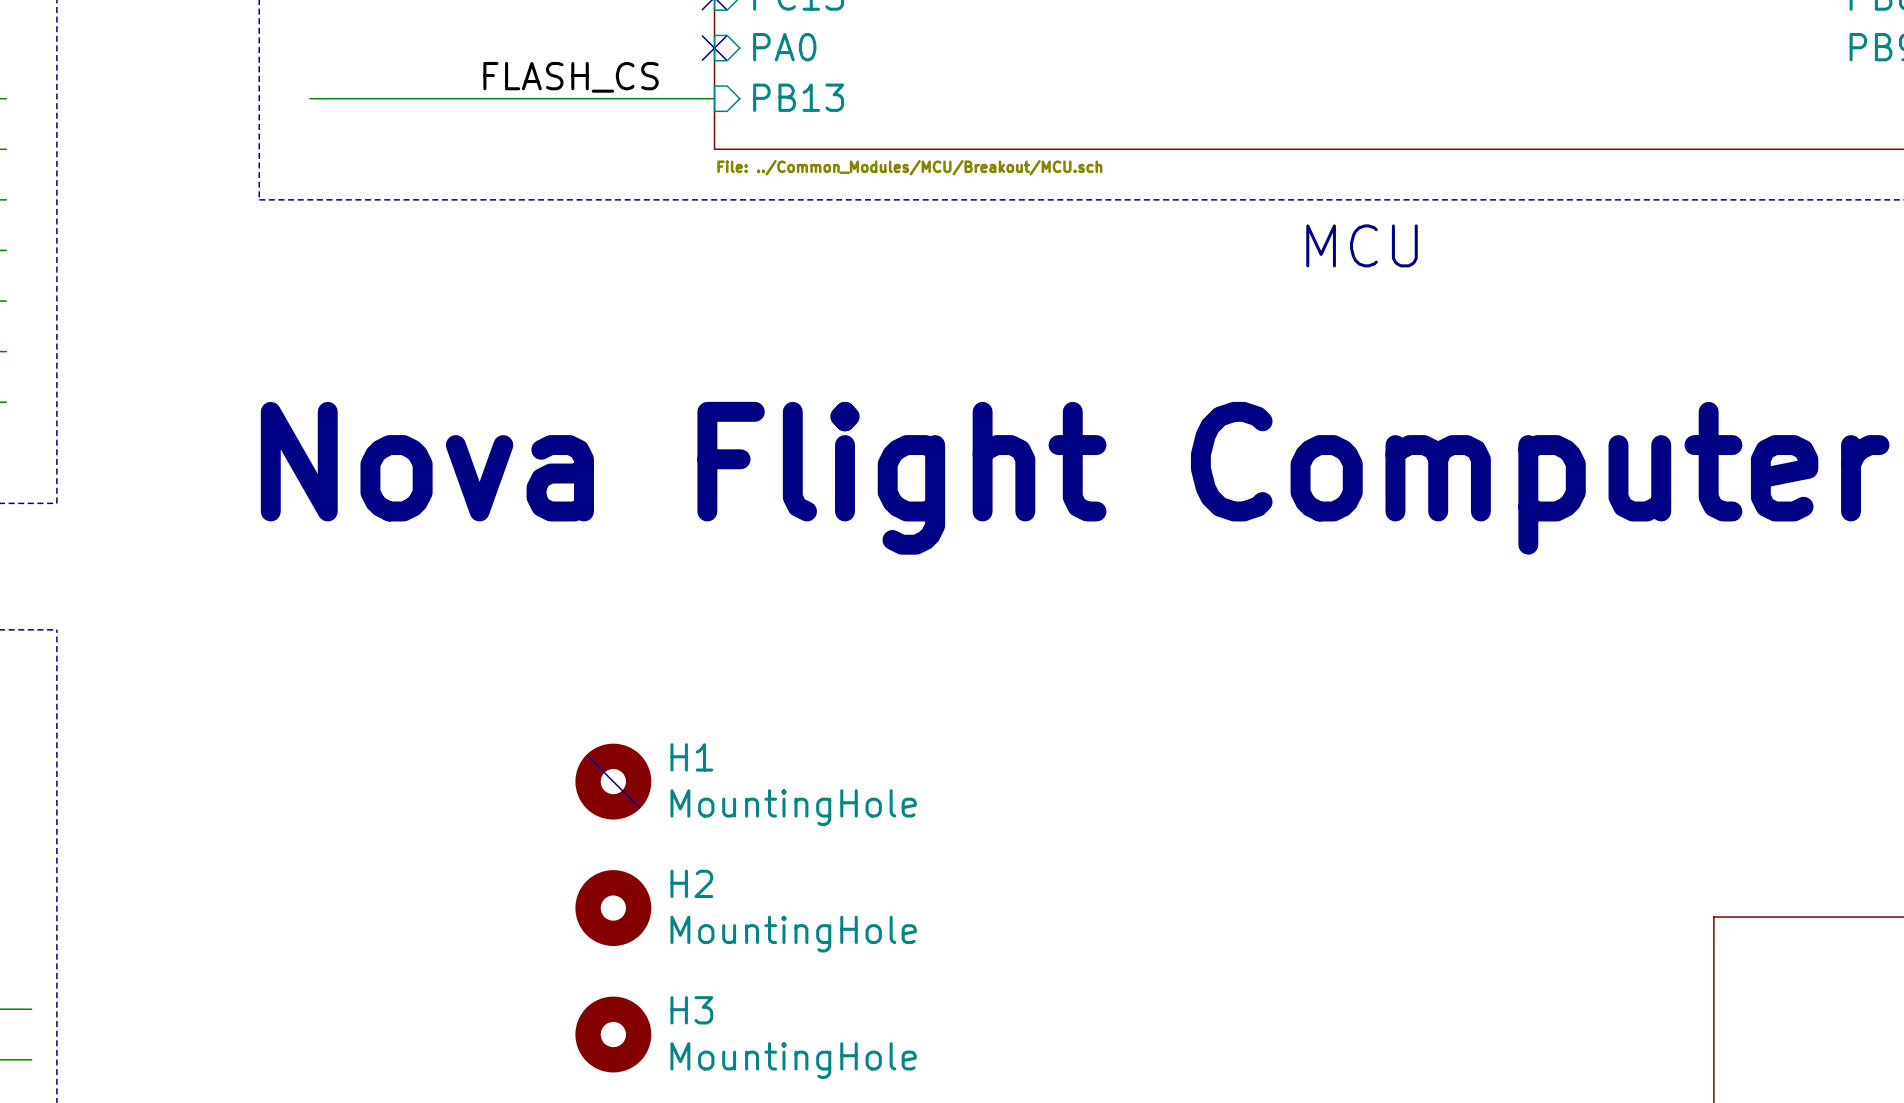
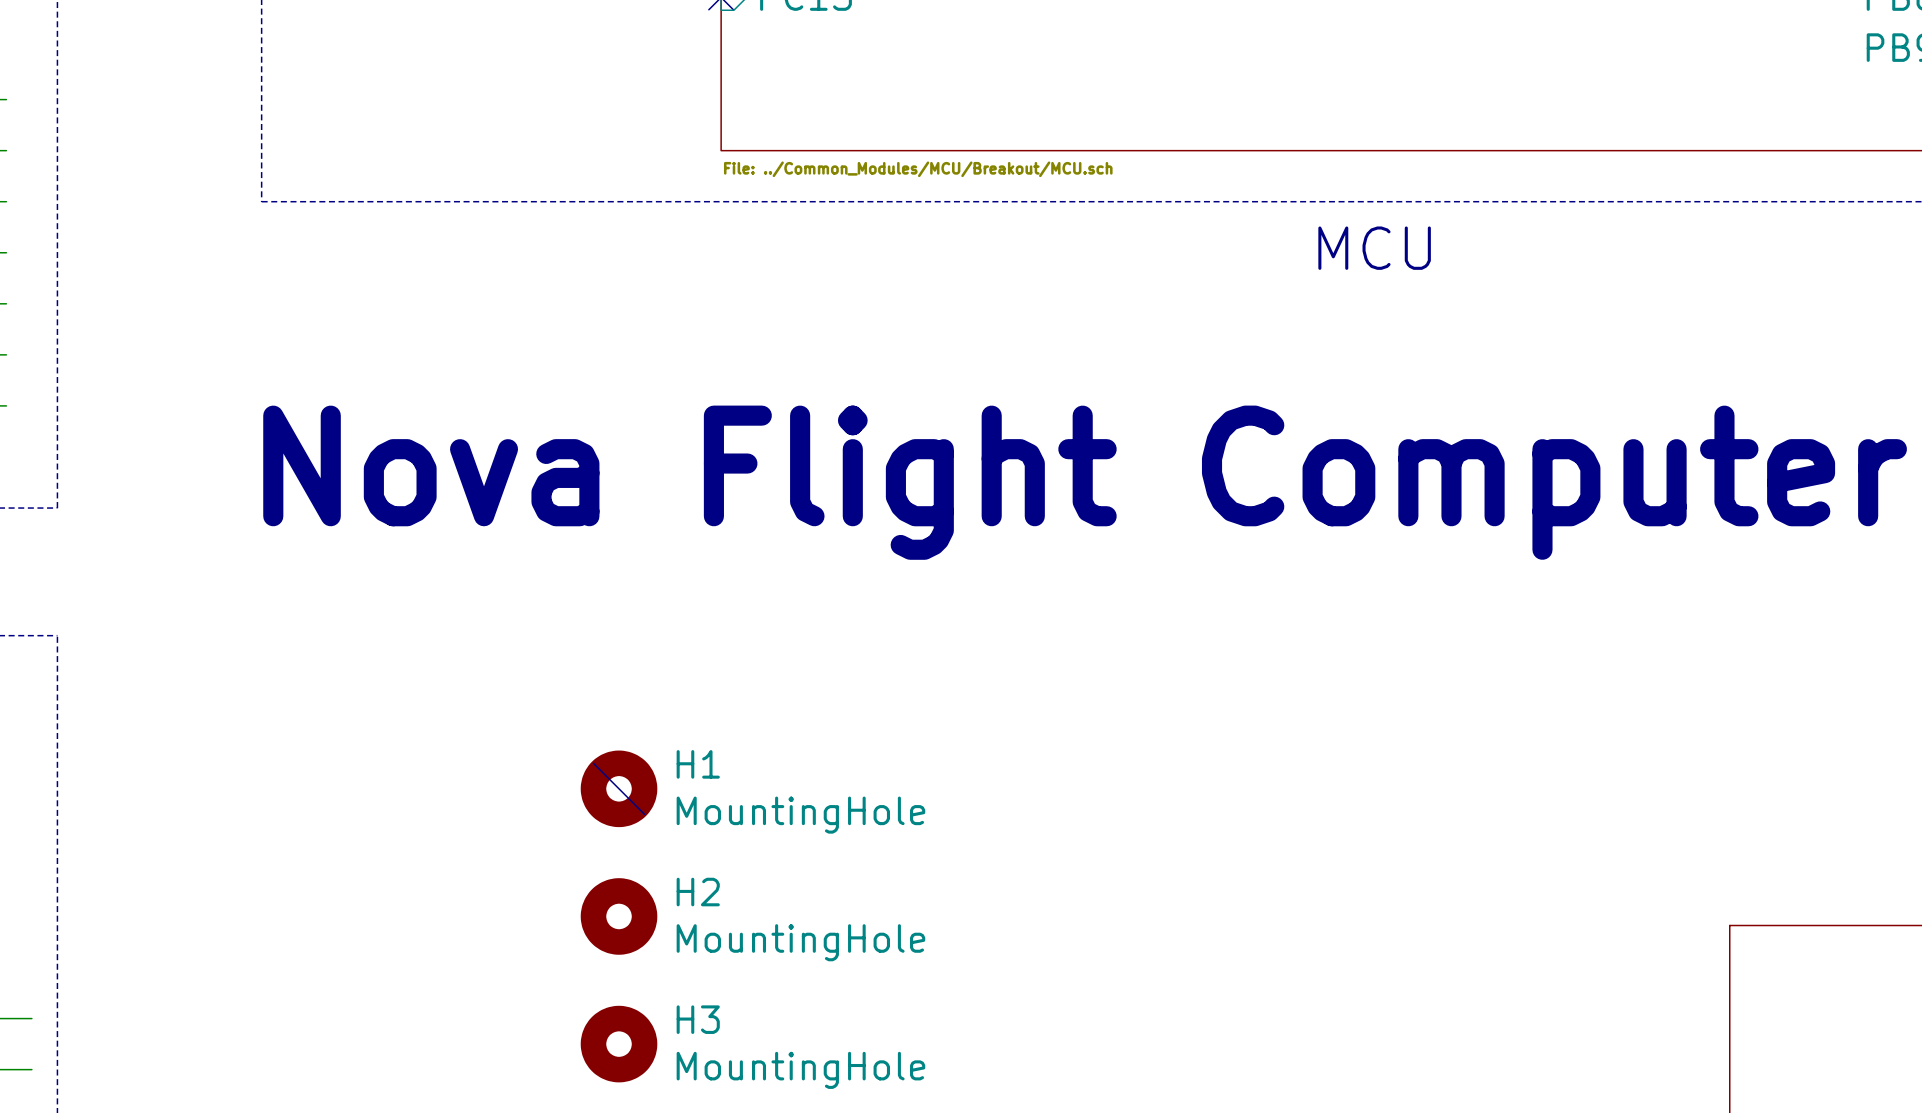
sheet pin: PA0 (784, 47) -> none
no-connect mark: (714, 48) -> none
label: FLASH_CS (571, 77) -> none
sheet pin: PB13 (798, 97) -> none
wire: (309, 98) (714, 98) -> none

